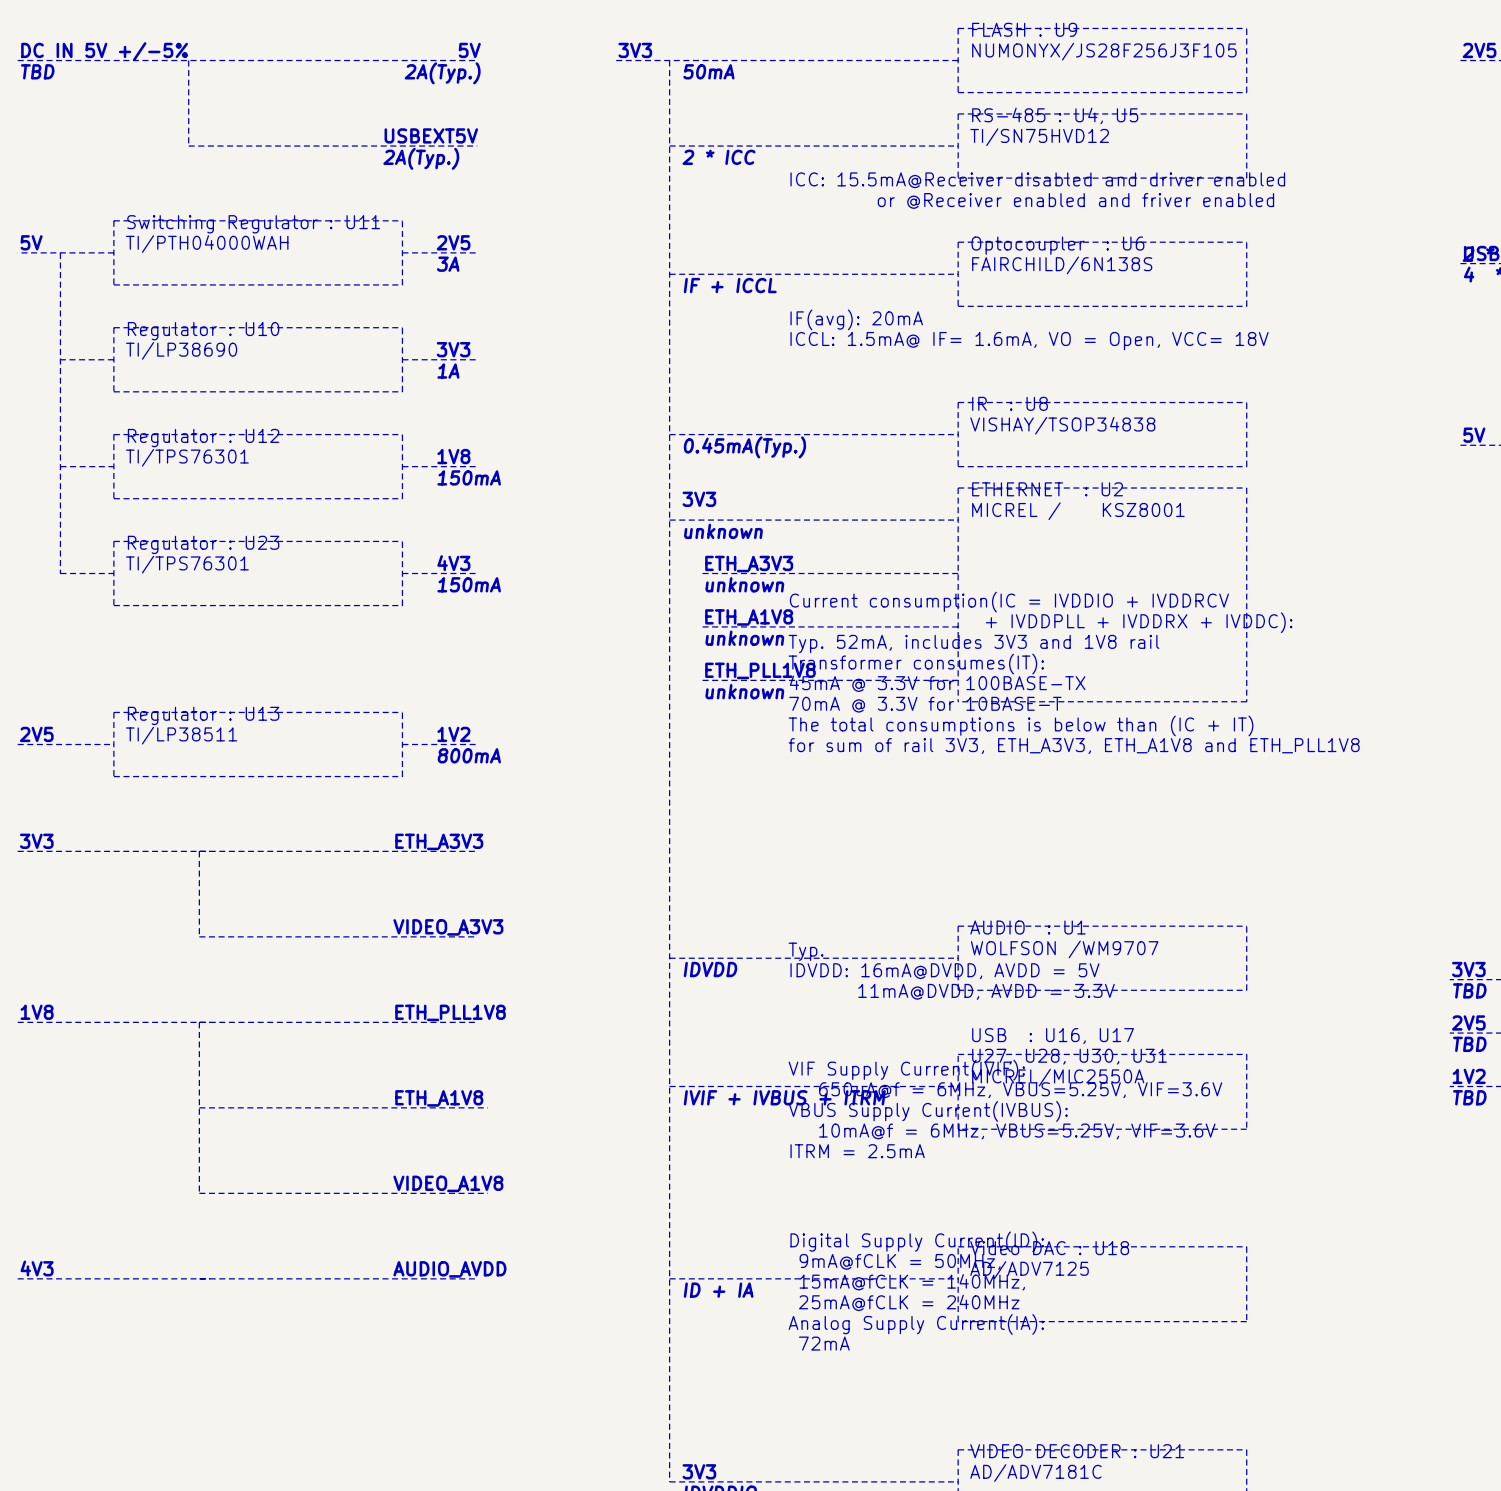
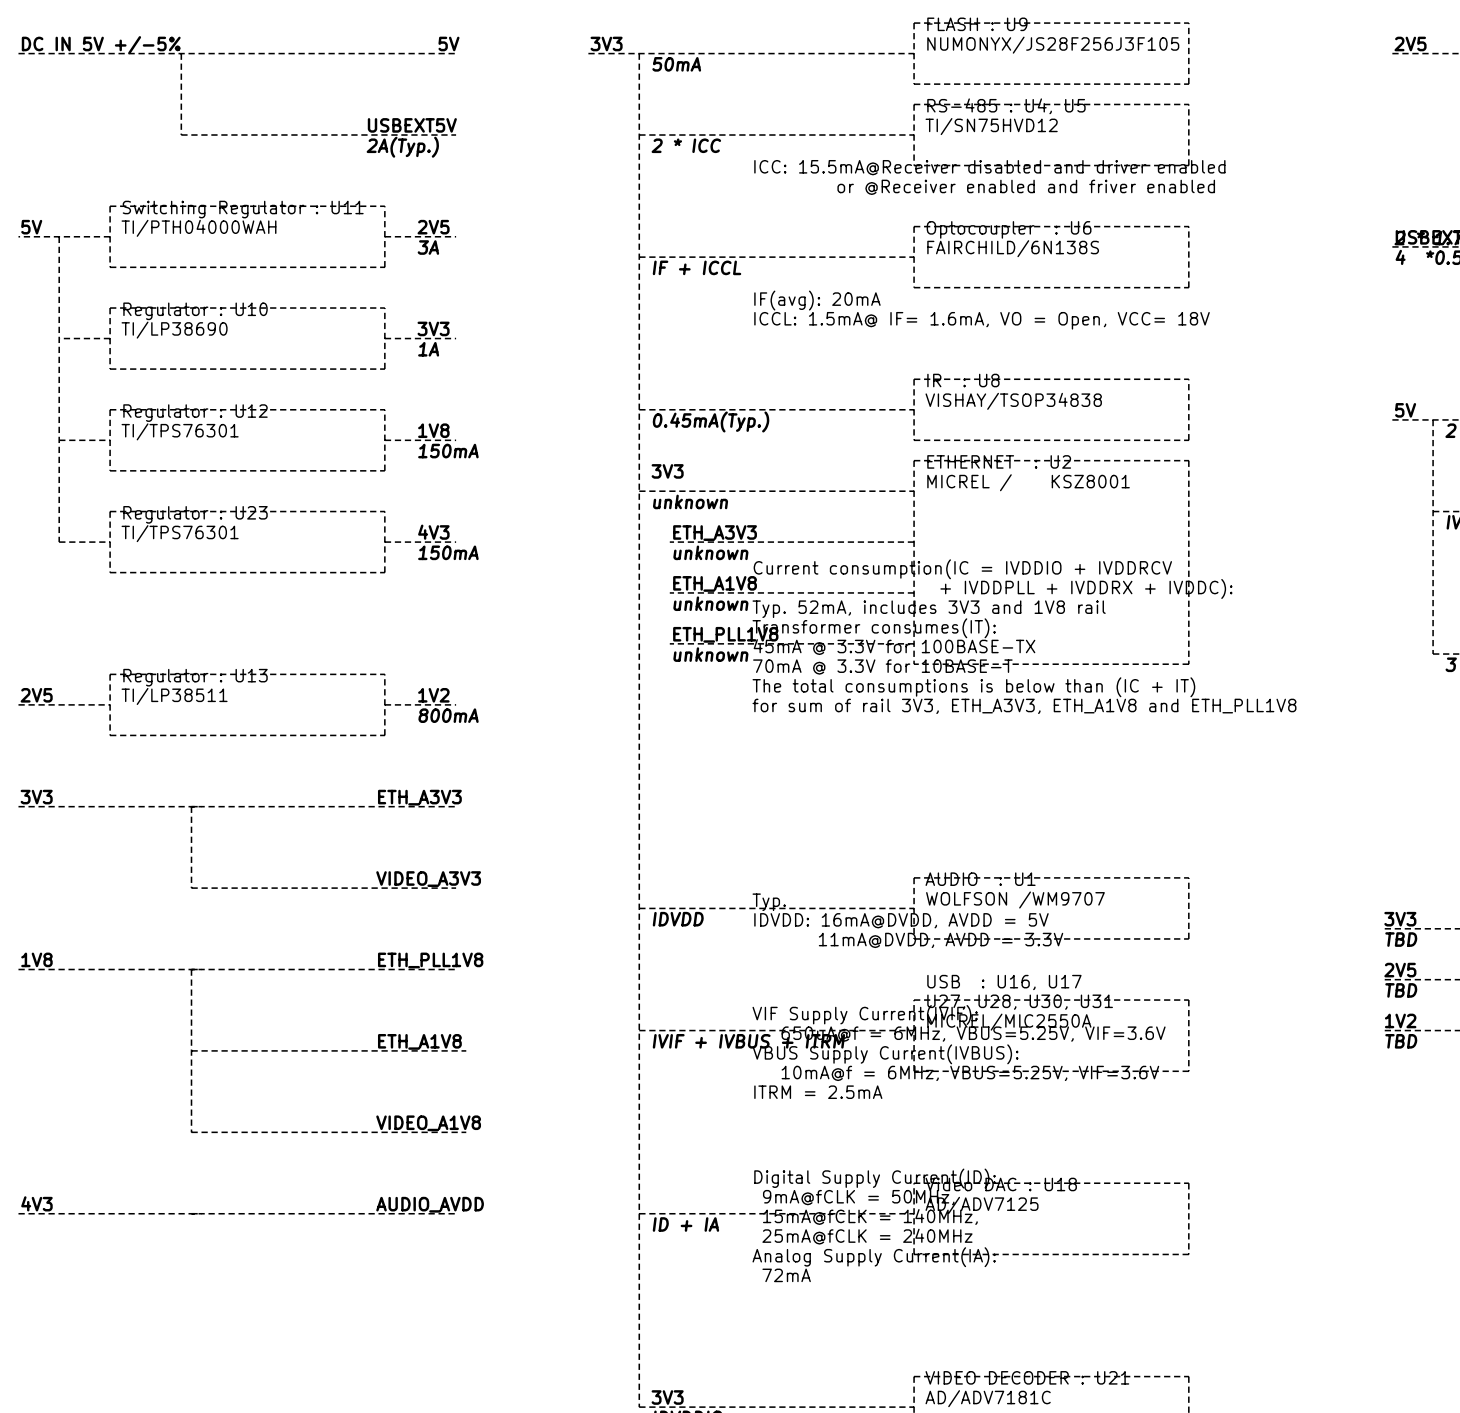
text: TBD (37, 71) -> none
text: 2A(Typ.) (442, 73) -> none

